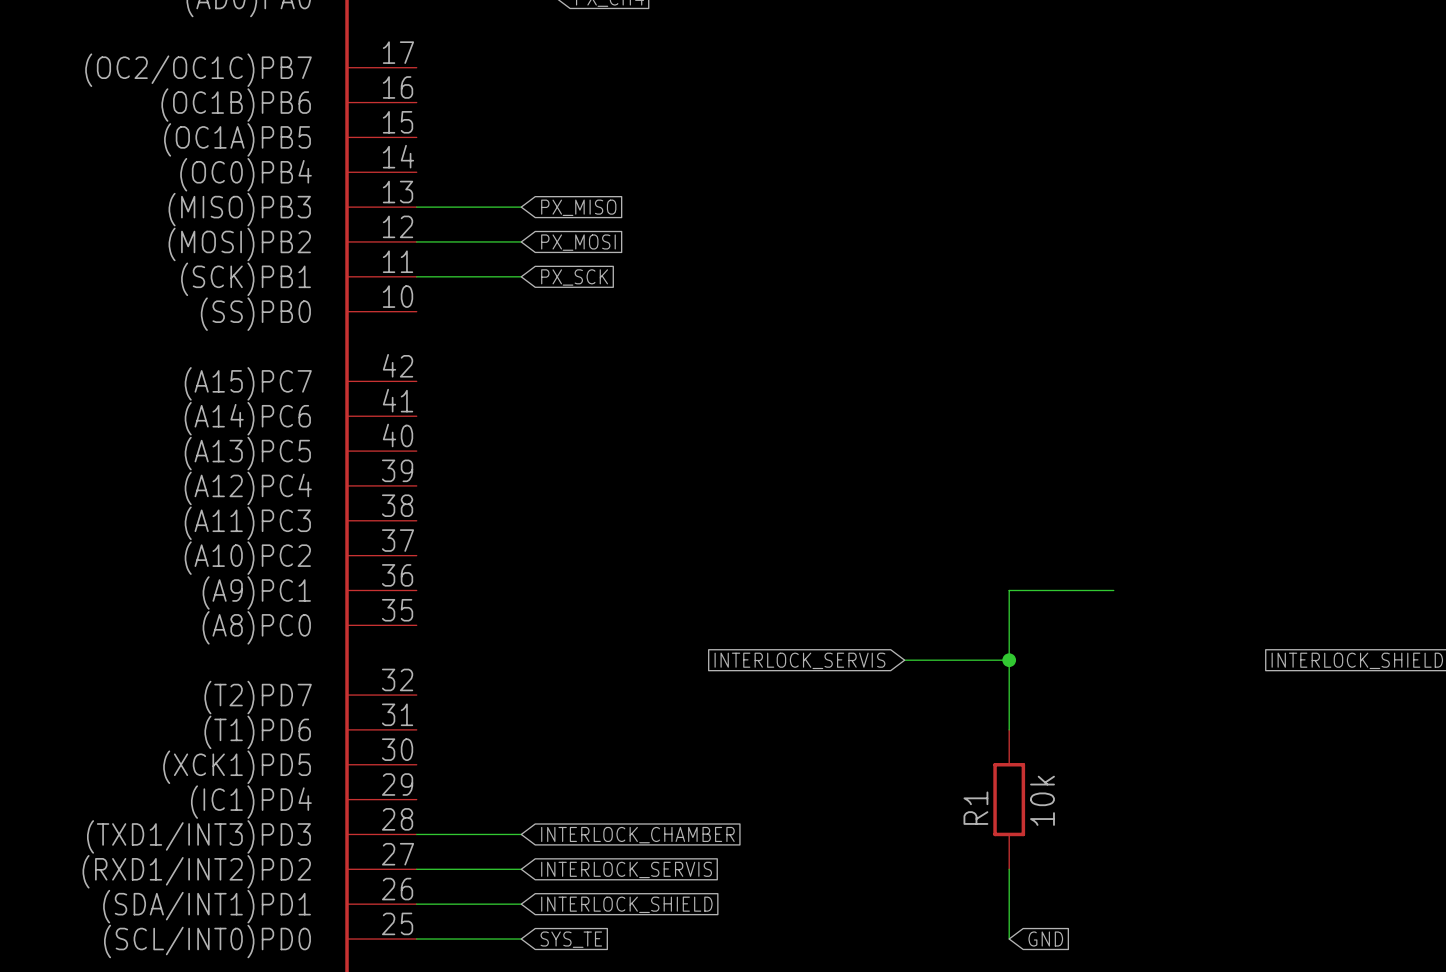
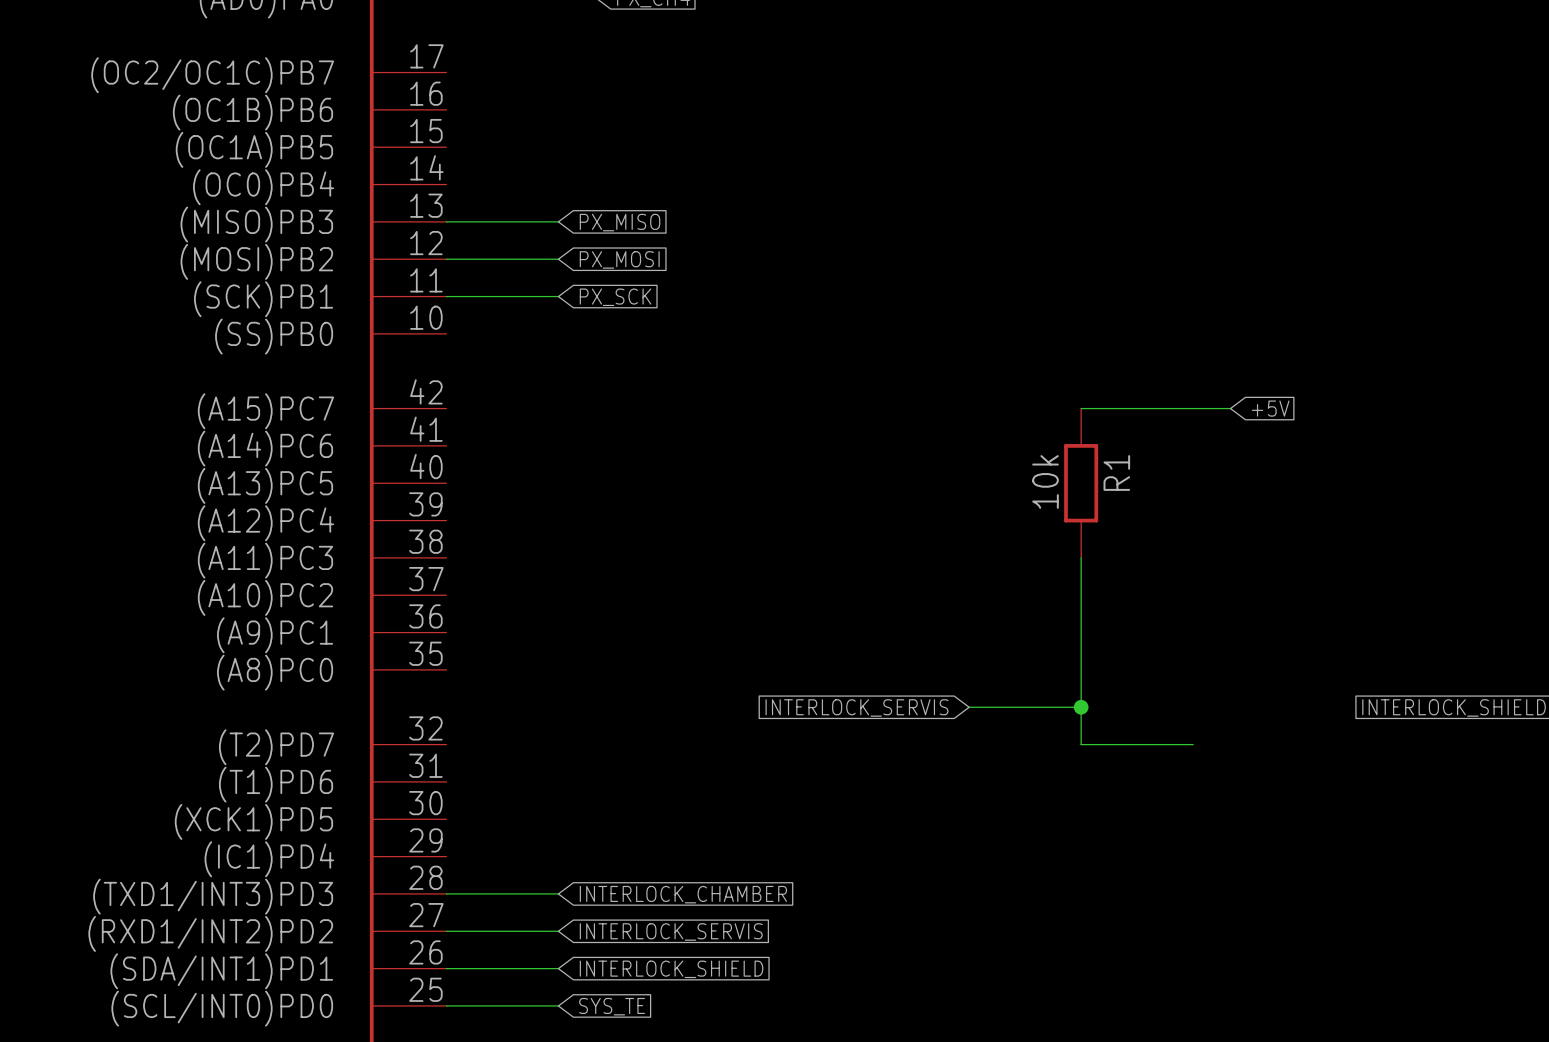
wire: none -> (1081, 408) (1230, 408)
global label: none -> +5V (1270, 408)
wire: (1009, 590) (1113, 590) -> (1081, 632) (1081, 557)
wire: (1009, 695) (1009, 729) -> (1081, 744) (1193, 744)
R1 position: (1009, 799) -> (1081, 483)
R1 value position: 10k (1042, 800) -> 10k (1045, 481)
R1 name position: R1 (975, 808) -> R1 (1116, 472)
wire: (1009, 869) (1009, 939) -> none
global label: GND (1045, 939) -> none

